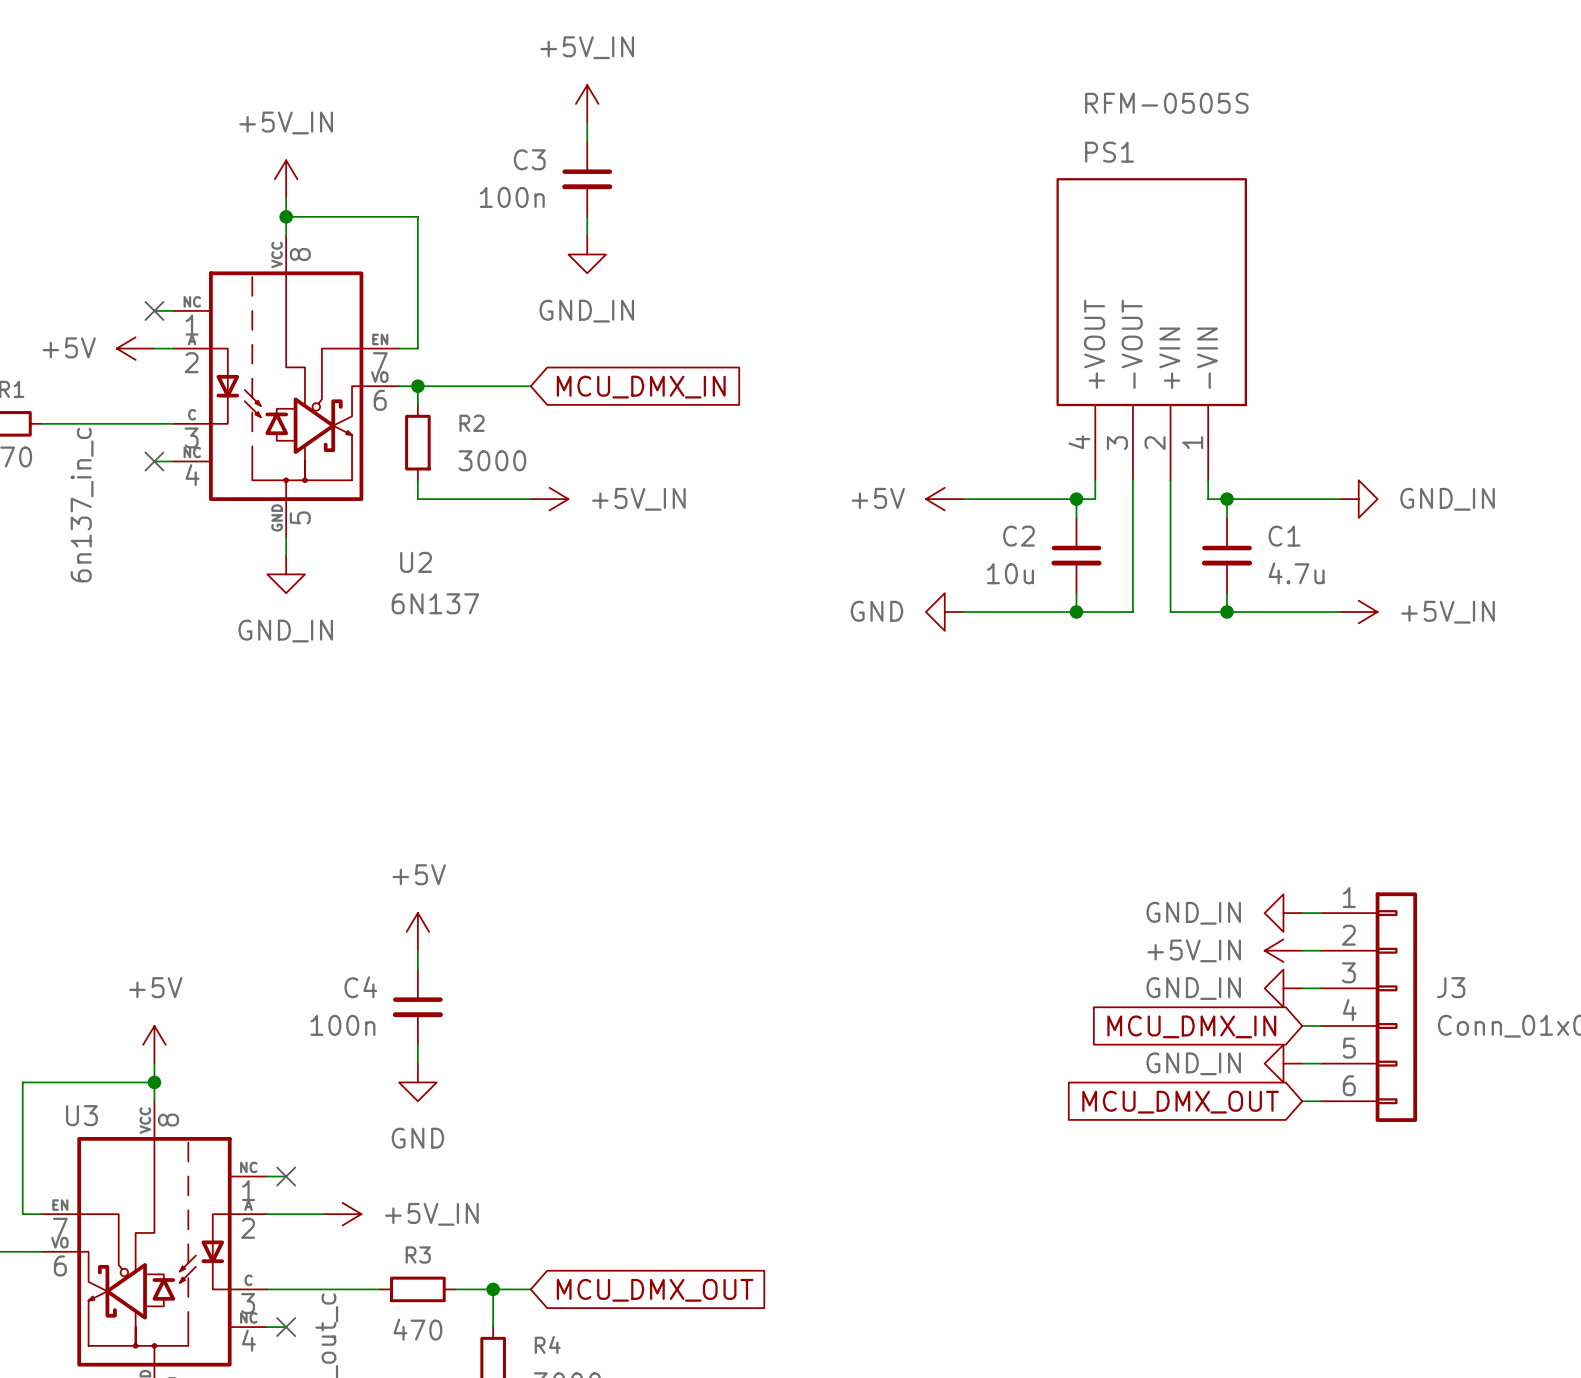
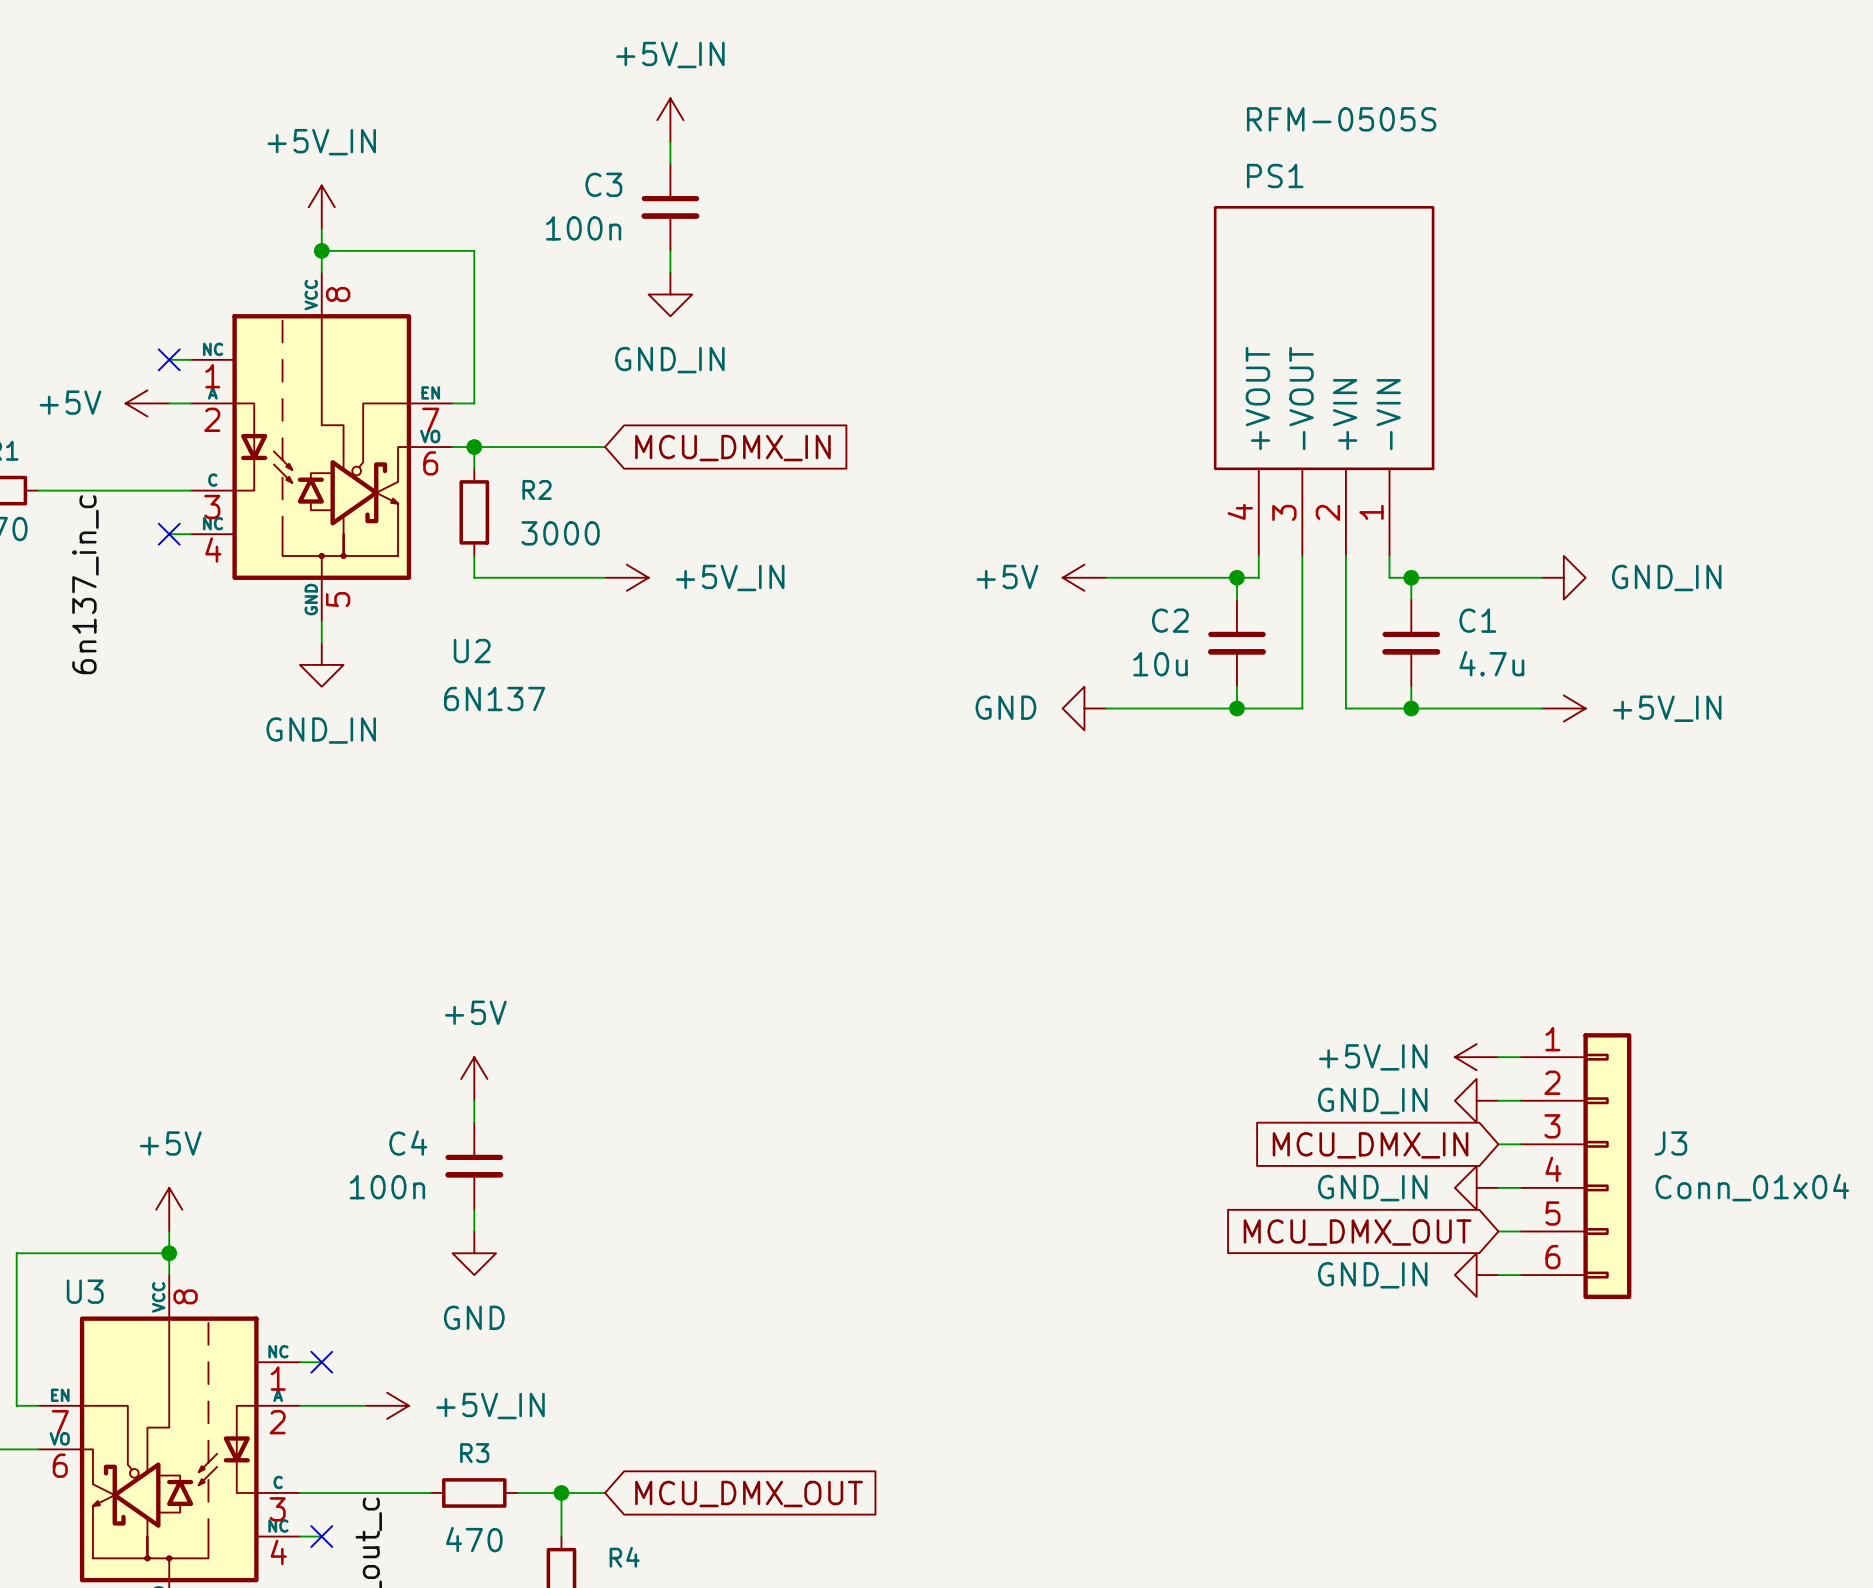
power symbol: GND_IN (1283, 913) -> +5V_IN (1476, 1057)
power symbol: +5V_IN (1283, 950) -> GND_IN (1476, 1100)
power symbol: GND_IN (1283, 988) -> none
power symbol: none -> GND_IN (1476, 1187)
global label position: MCU_DMX_IN (1191, 1026) -> MCU_DMX_IN (1370, 1145)
power symbol: GND_IN (1283, 1063) -> none
power symbol: none -> GND_IN (1476, 1275)
global label position: MCU_DMX_OUT (1180, 1102) -> MCU_DMX_OUT (1357, 1232)

